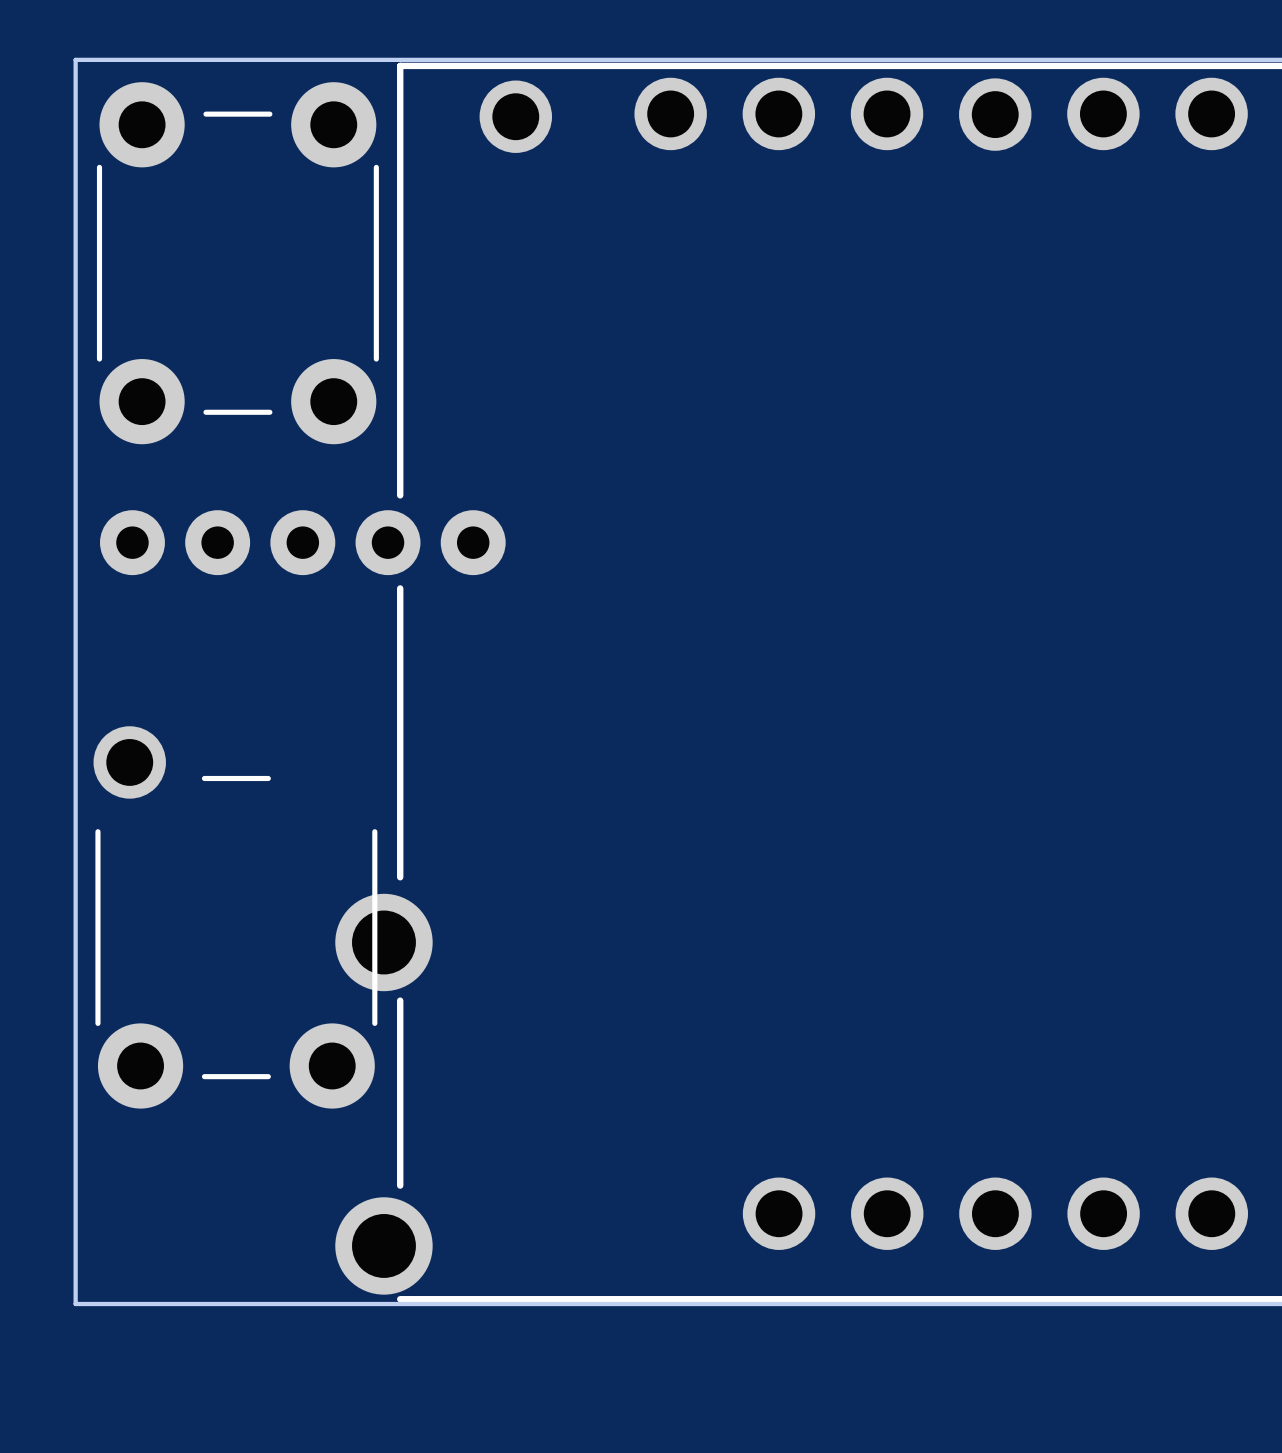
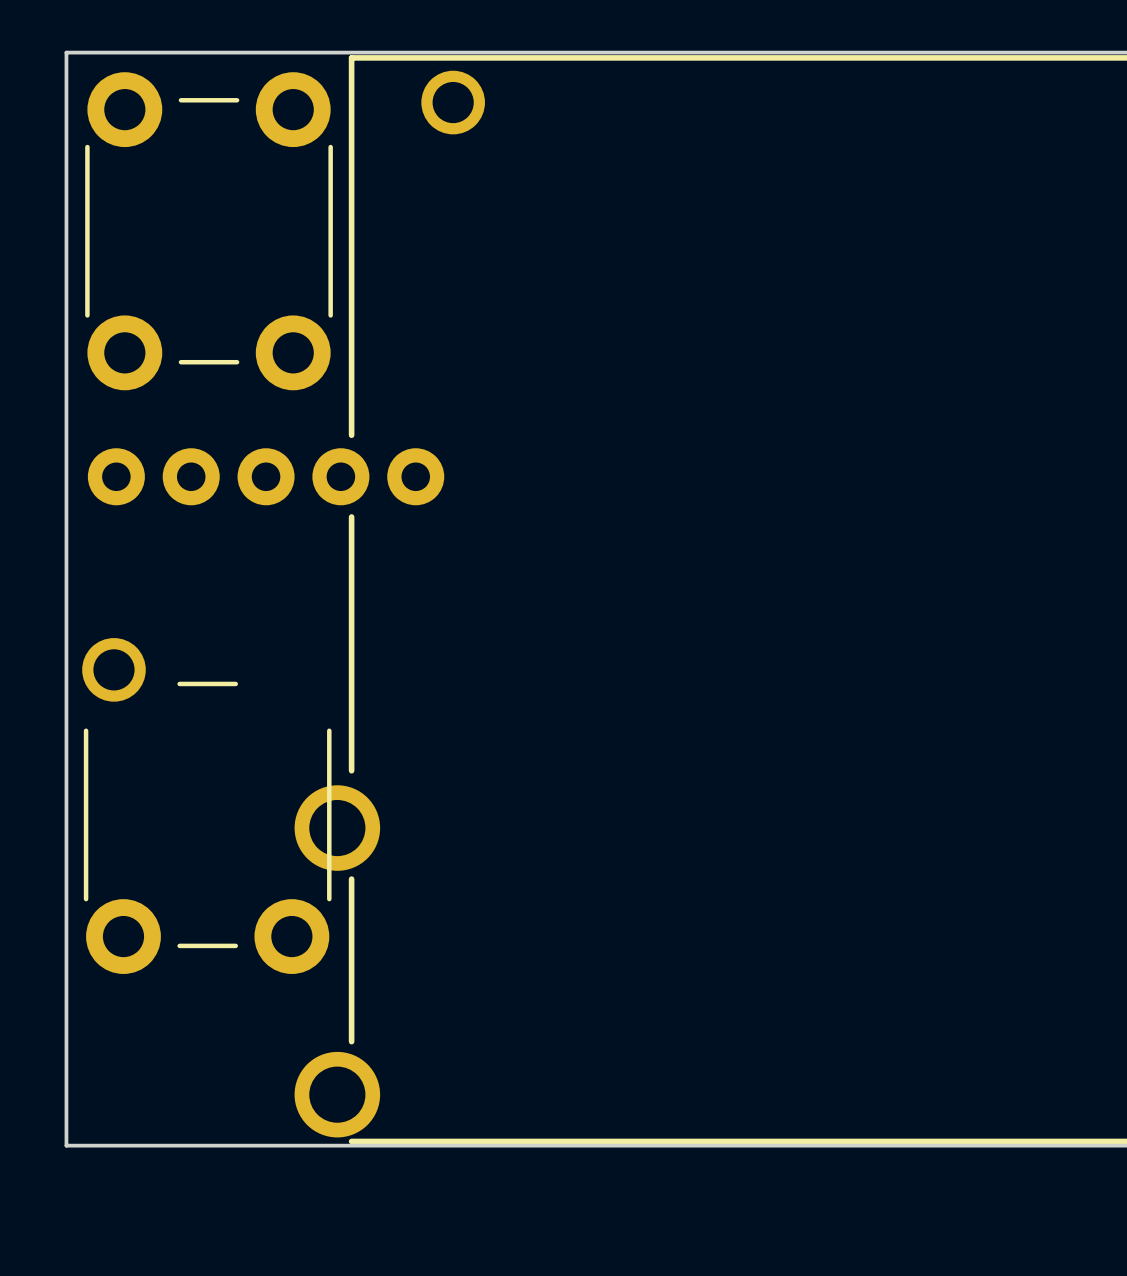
part: (670, 113) -> none
part: (778, 113) -> none
part: (887, 113) -> none
part: (1103, 113) -> none
part: (1211, 113) -> none
part: (995, 114) -> none
part: (779, 1213) -> none
part: (887, 1213) -> none
part: (995, 1213) -> none
part: (1103, 1213) -> none
part: (1211, 1213) -> none

